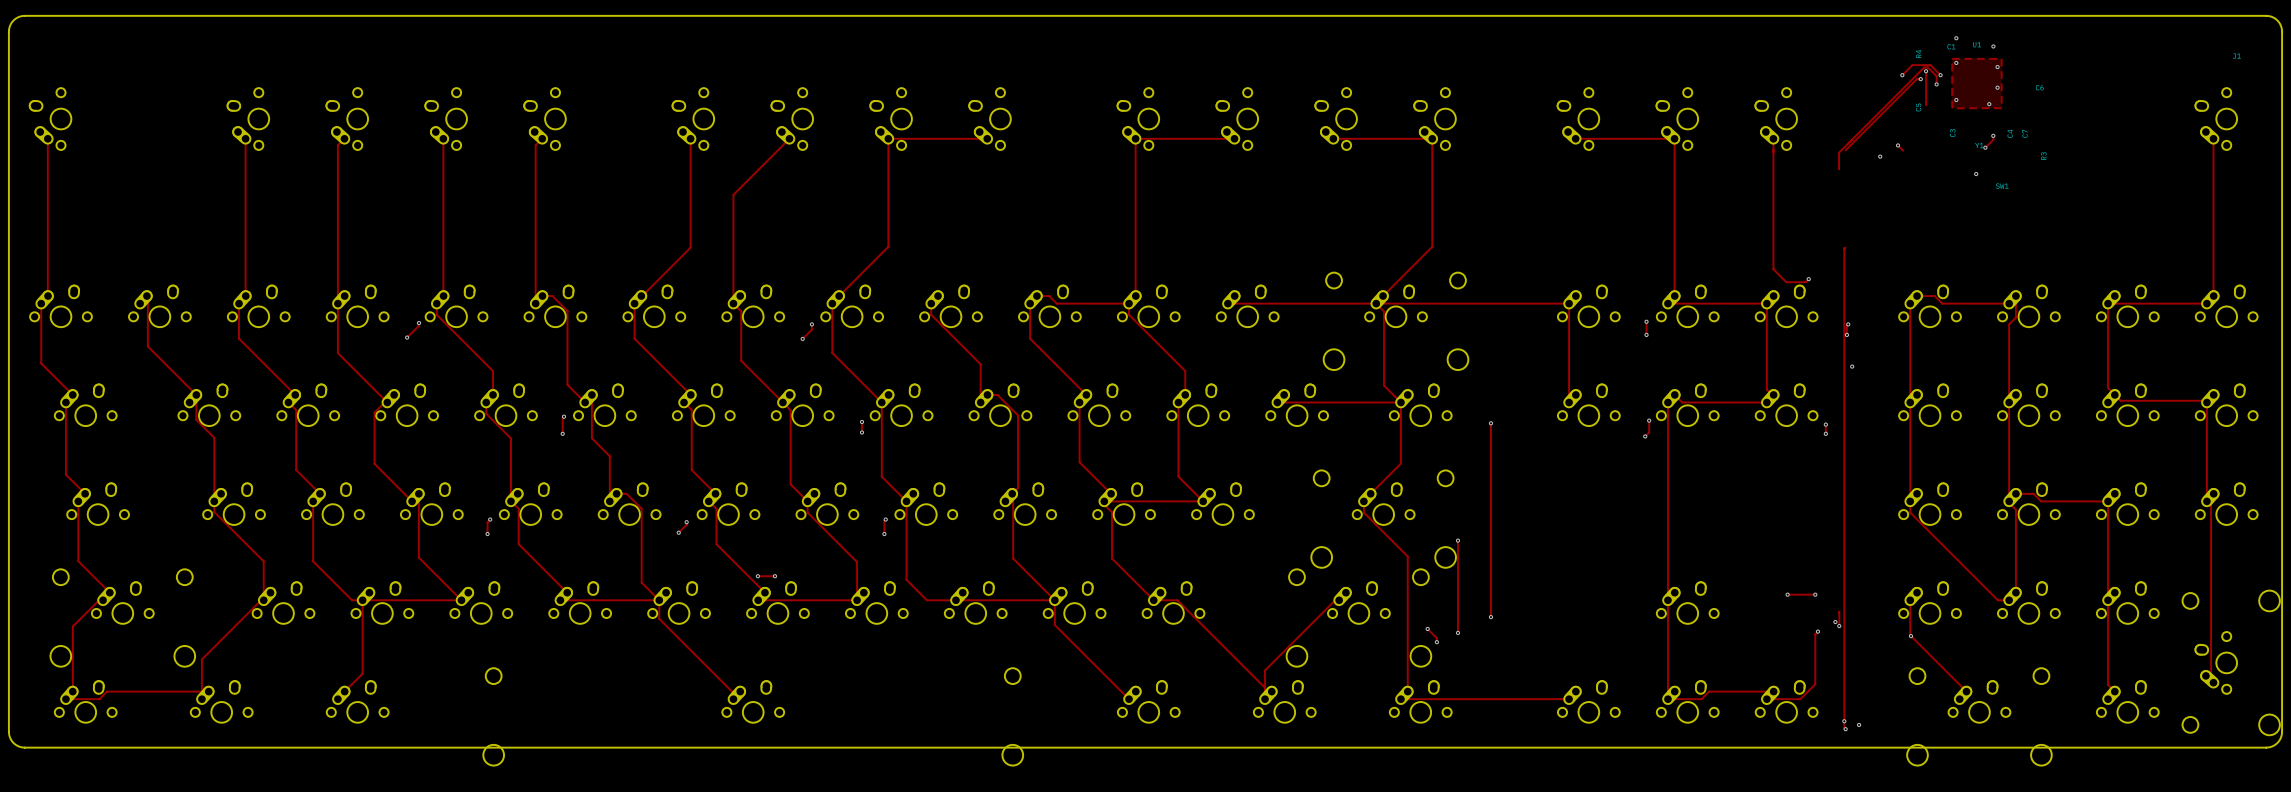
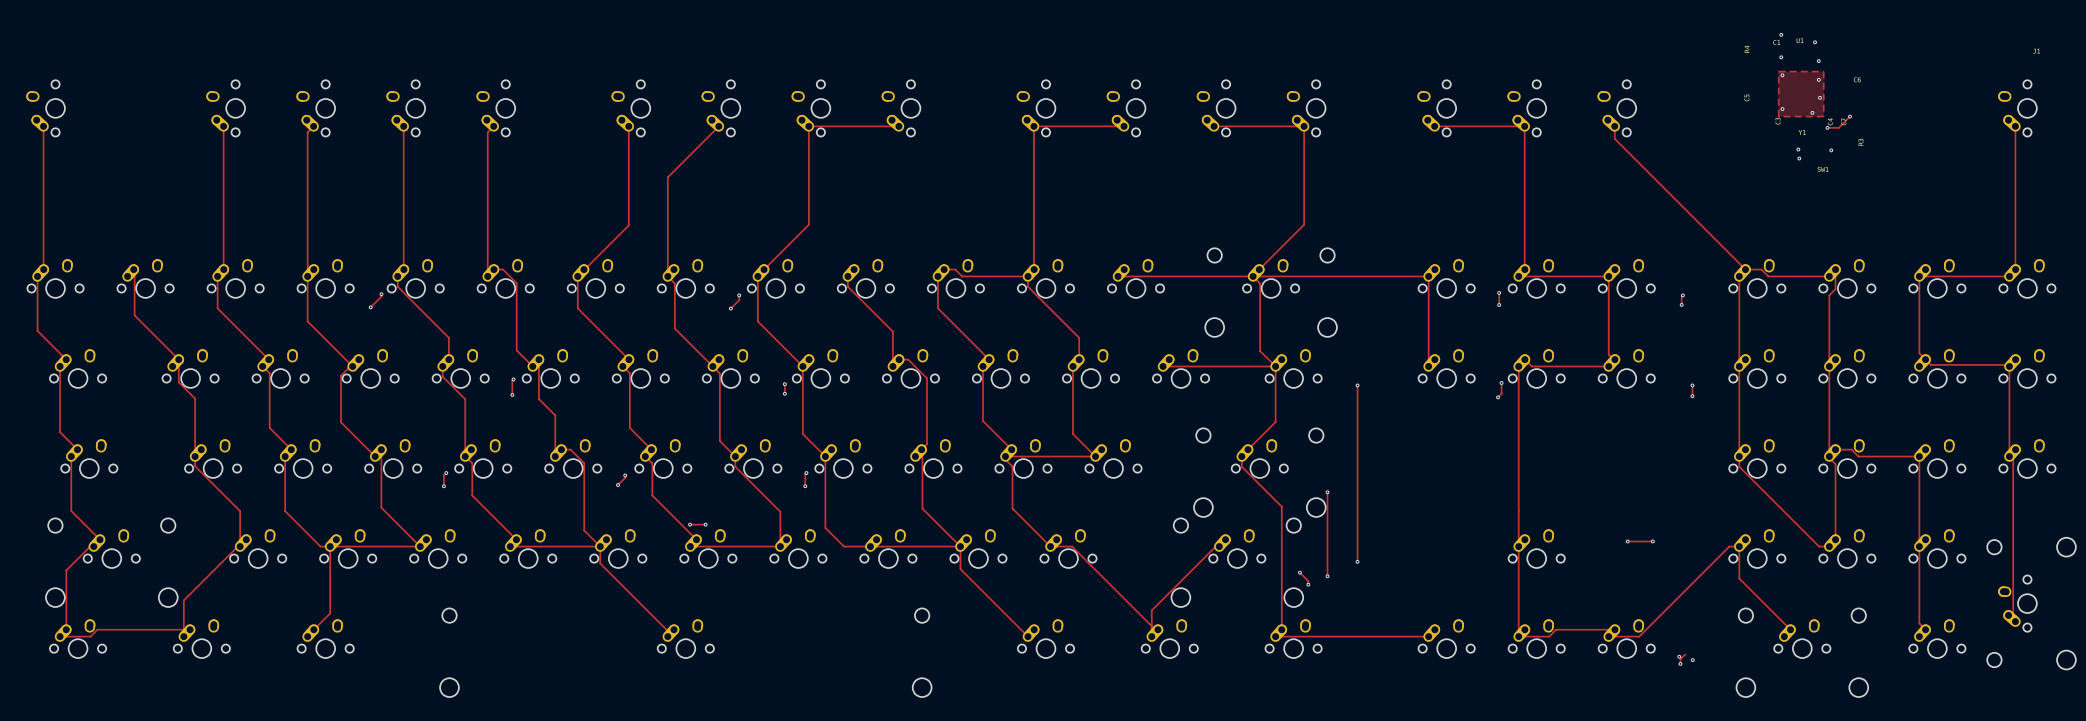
board edge: (24, 15) (2270, 16) (2278, 22) (2282, 31) (2281, 735) (2275, 744) (2266, 747) (20, 747) (12, 741) (8, 731) (8, 31) (13, 20) (24, 15) -> none
zone outline: (1952, 58) (1952, 108) (2001, 108) (2001, 58) (1952, 58) -> (1778, 71) (1778, 116) (1823, 116) (1823, 71) (1778, 71)
track: (1926, 71) (1926, 105) -> none
via: (1926, 71) -> none
track: (1902, 75) (1912, 65) (1930, 65) (1940, 75) -> none
via: (1902, 75) -> none
via: (1940, 75) -> none
track: (1920, 79) (1916, 79) (1845, 150) -> none
via: (1920, 79) -> none
via: none -> (1782, 75)
track: (1936, 84) (1936, 76) (1927, 67) (1924, 67) (1839, 152) (1839, 168) -> none
via: (1936, 84) -> none
via: (1956, 100) -> none
via: (1989, 104) -> none
via: none -> (1819, 97)
via: none -> (1782, 109)
via: none -> (1812, 112)
track: none -> (1850, 116) (1838, 127) (1827, 127)
via: none -> (1850, 116)
track: (1993, 135) (1993, 139) (1985, 147) -> none
via: (1993, 135) -> none
via: none -> (1827, 127)
track: (1898, 145) (1903, 150) -> none
via: (1898, 145) -> none
via: (1985, 147) -> none
track: (1773, 152) (1773, 269) (1786, 282) (1805, 282) (1808, 279) -> (1614, 138) (1745, 269)
via: (1880, 156) -> none
via: none -> (1798, 149)
via: none -> (1831, 150)
track: (1844, 247) (1845, 729) -> (1685, 654) (1680, 659) (1680, 663)
track: (1845, 248) (1844, 249) -> none
via: (1808, 279) -> none
via: (1852, 366) -> none
track: none -> (1692, 385) (1692, 396)
via: none -> (1692, 385)
track: (1825, 424) (1825, 433) -> none
via: (1825, 424) -> none
via: (1825, 433) -> none
via: none -> (1692, 396)
track: (1839, 613) (1839, 626) -> none
via: (1835, 622) -> none
via: (1839, 626) -> none
track: (1817, 631) (1815, 634) (1815, 684) -> (1739, 546) (1729, 546) (1652, 623)
via: (1817, 631) -> none
via: (1911, 636) -> none

